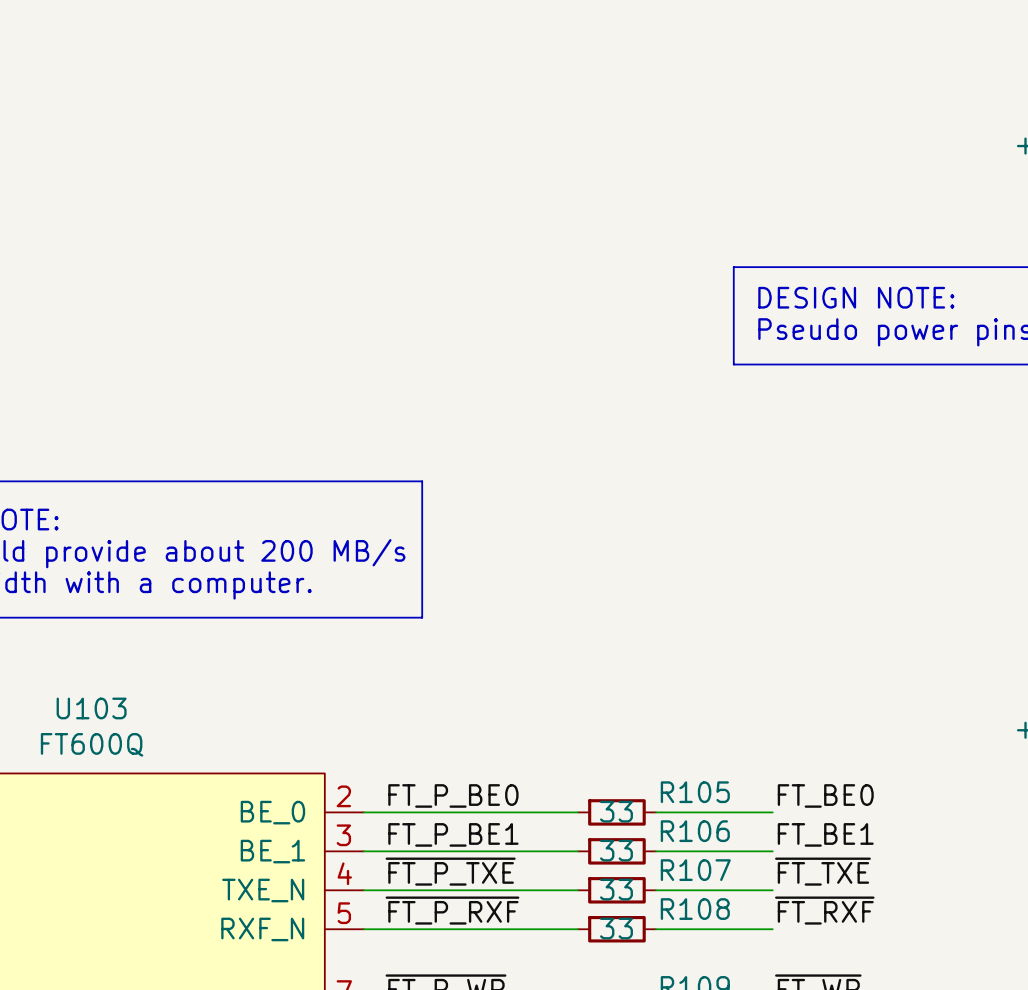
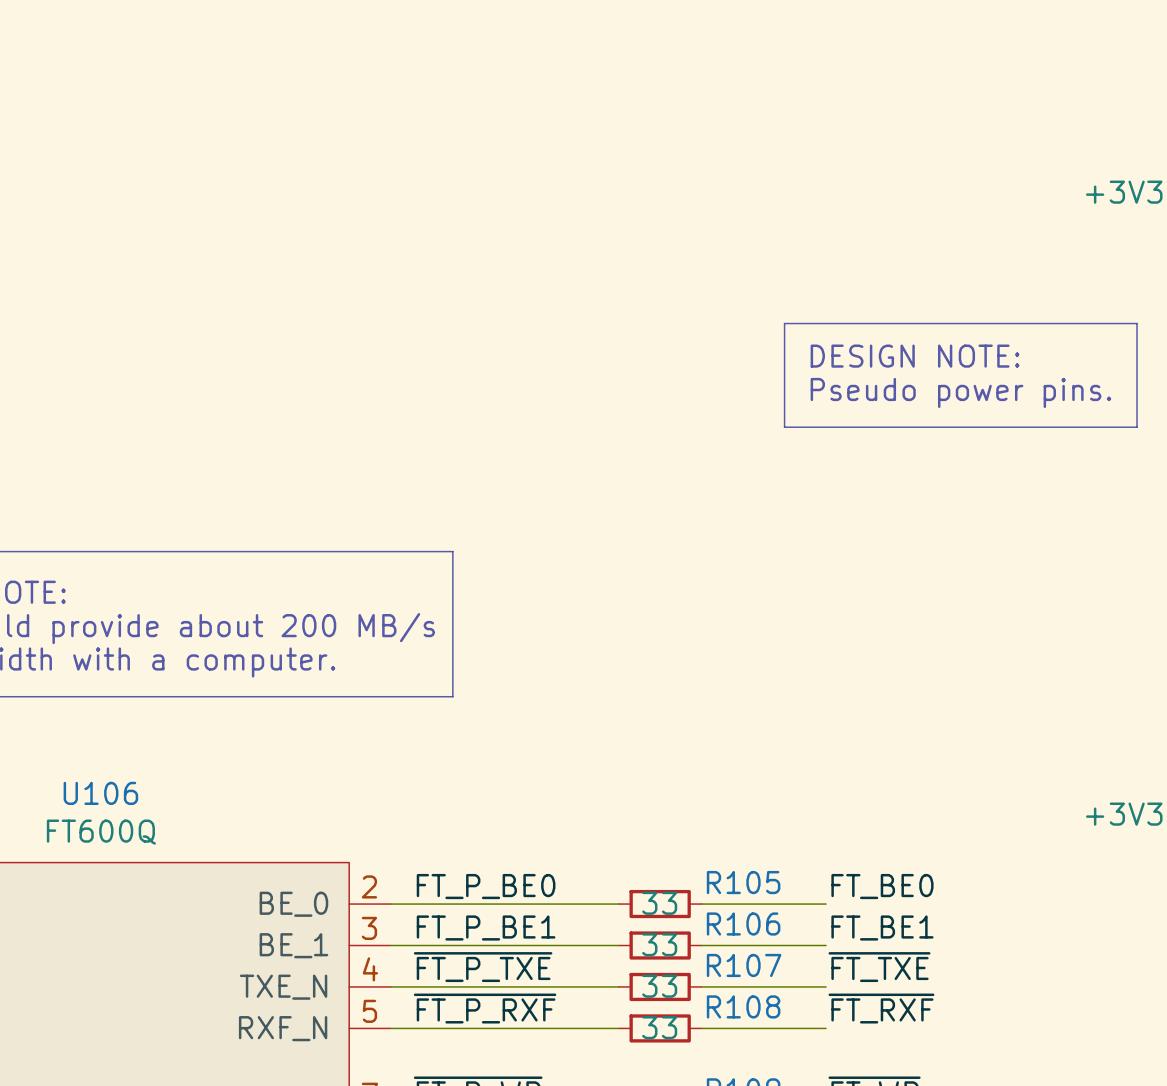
U103 name: U103 (91, 708) -> U106 (100, 793)

